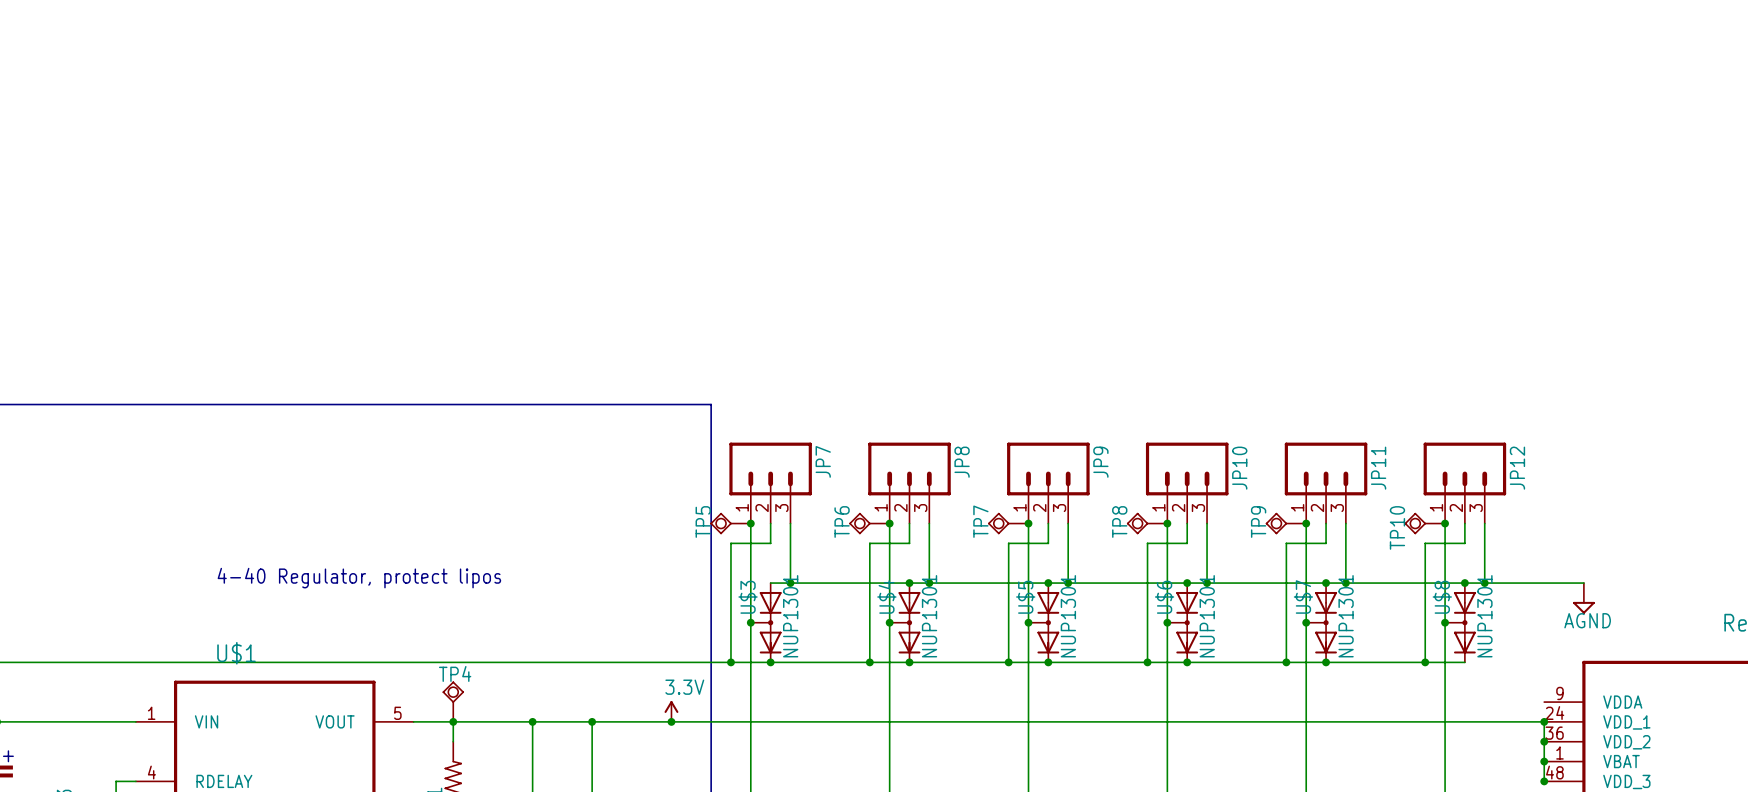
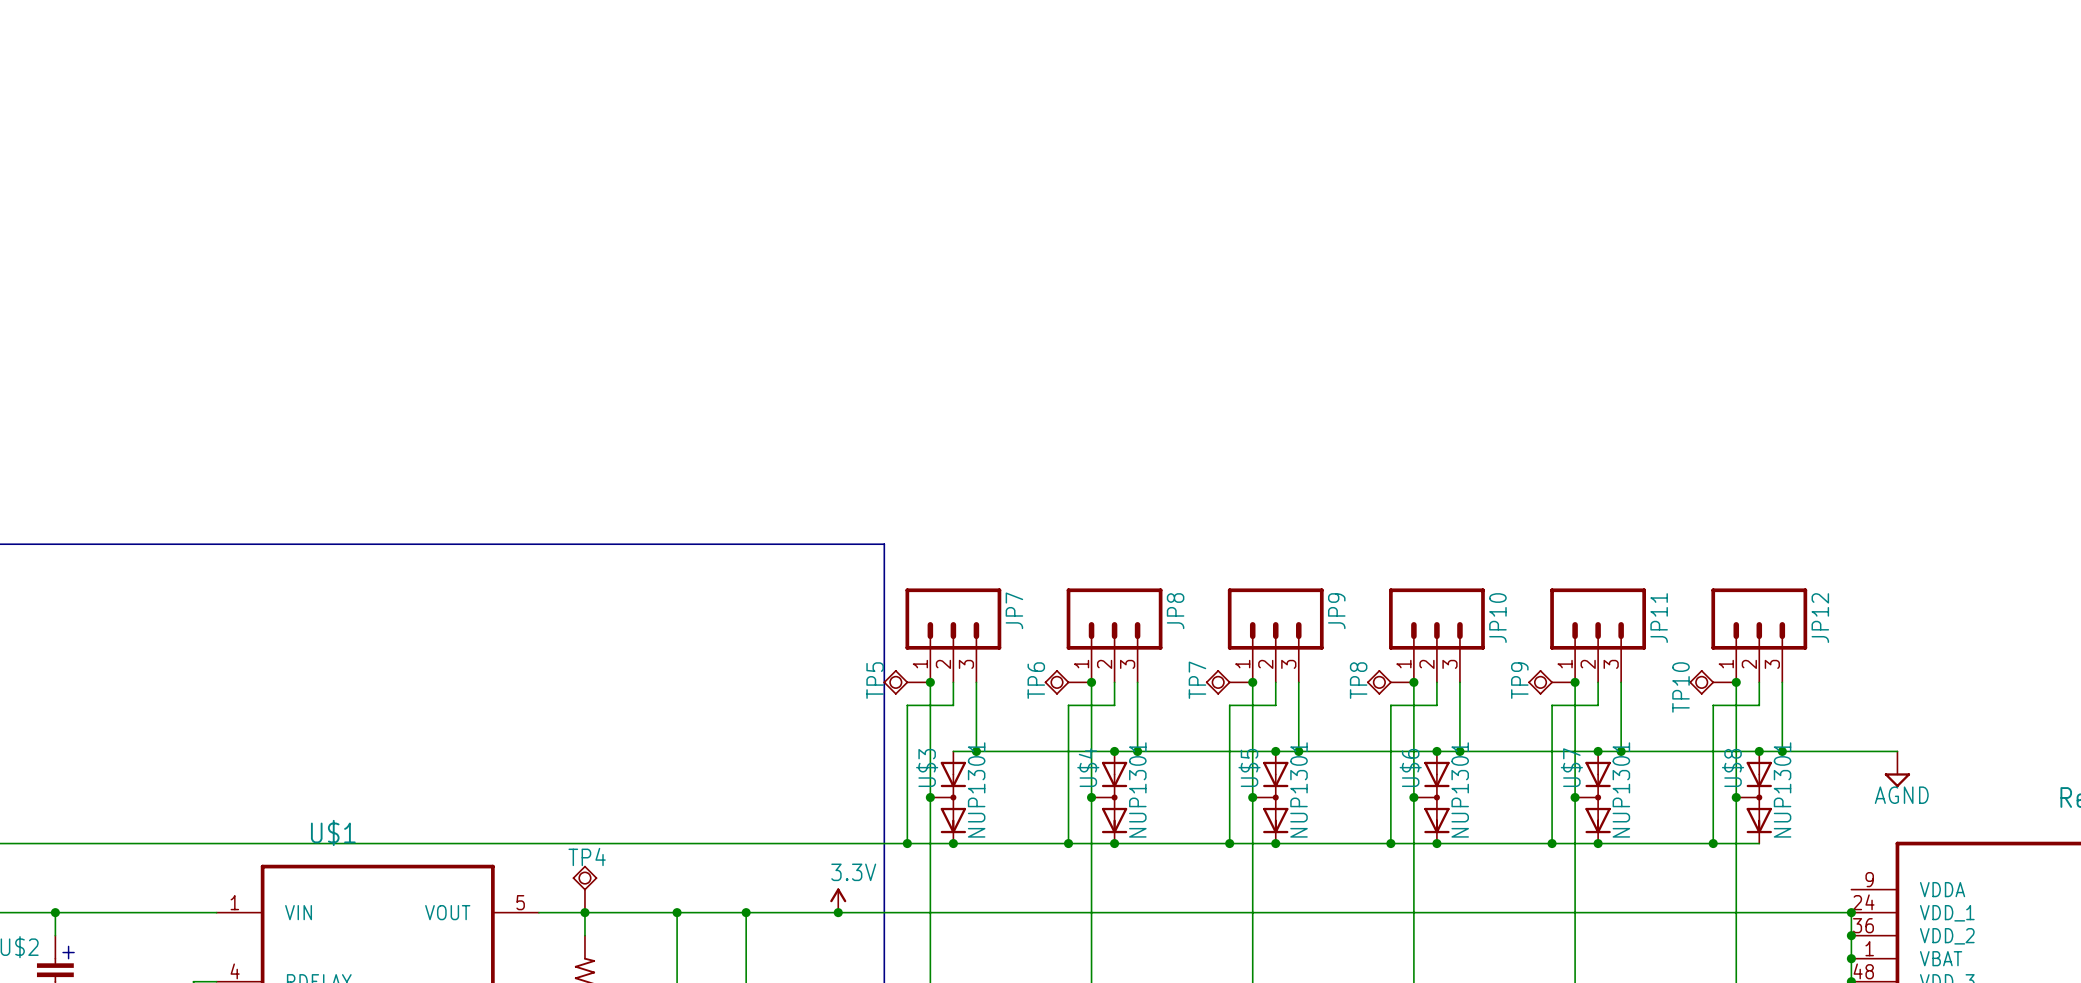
text: 4-40 Regulator, protect lipos (359, 578) -> none

